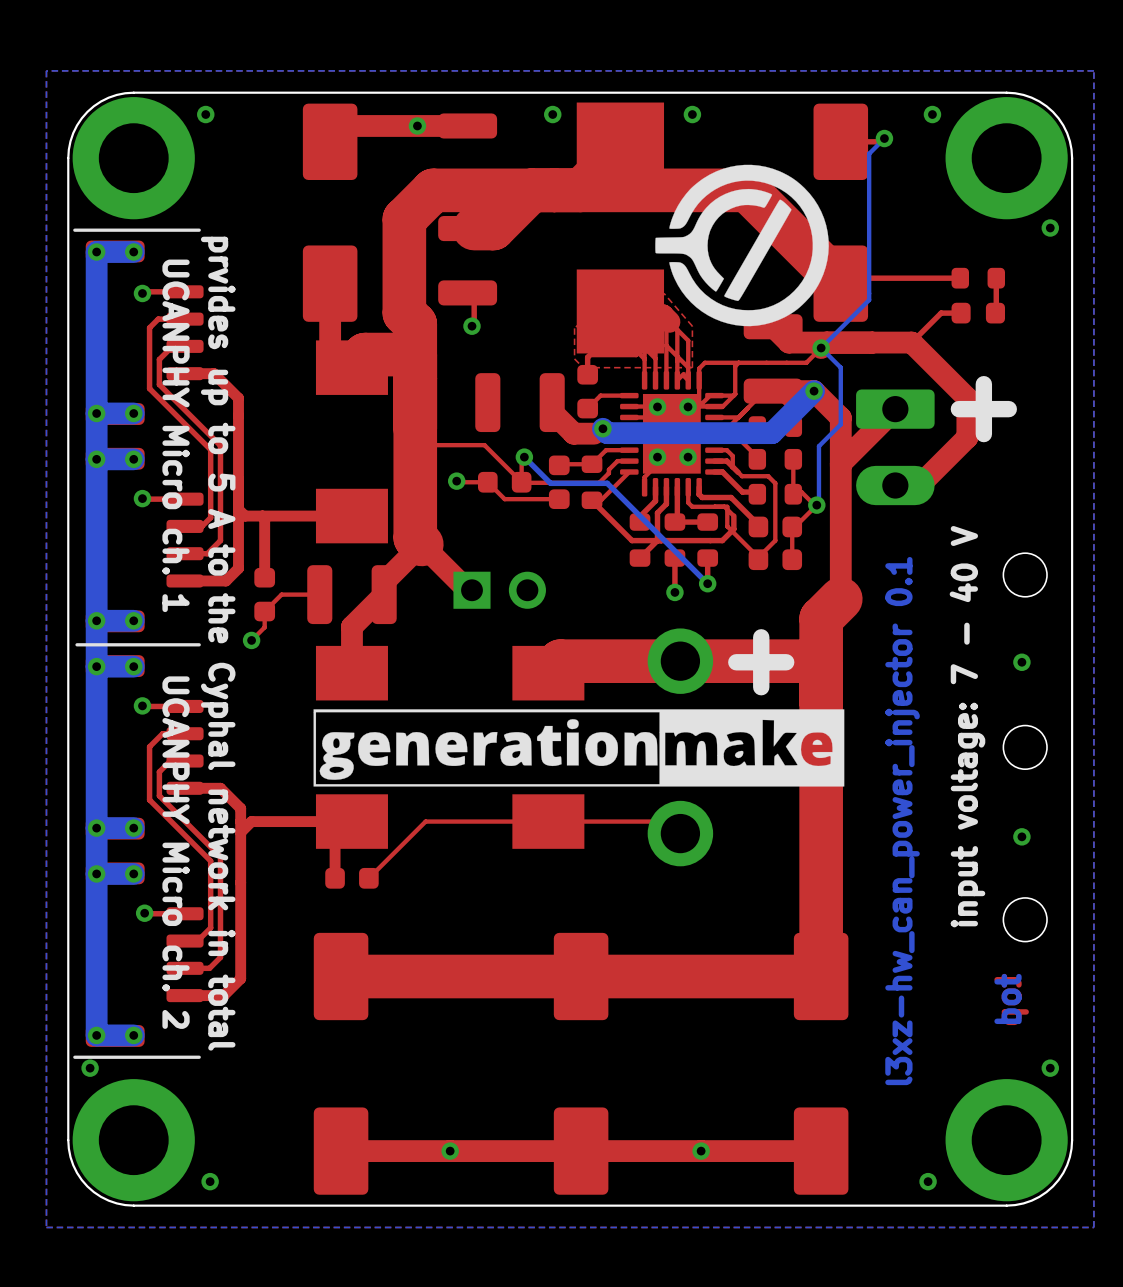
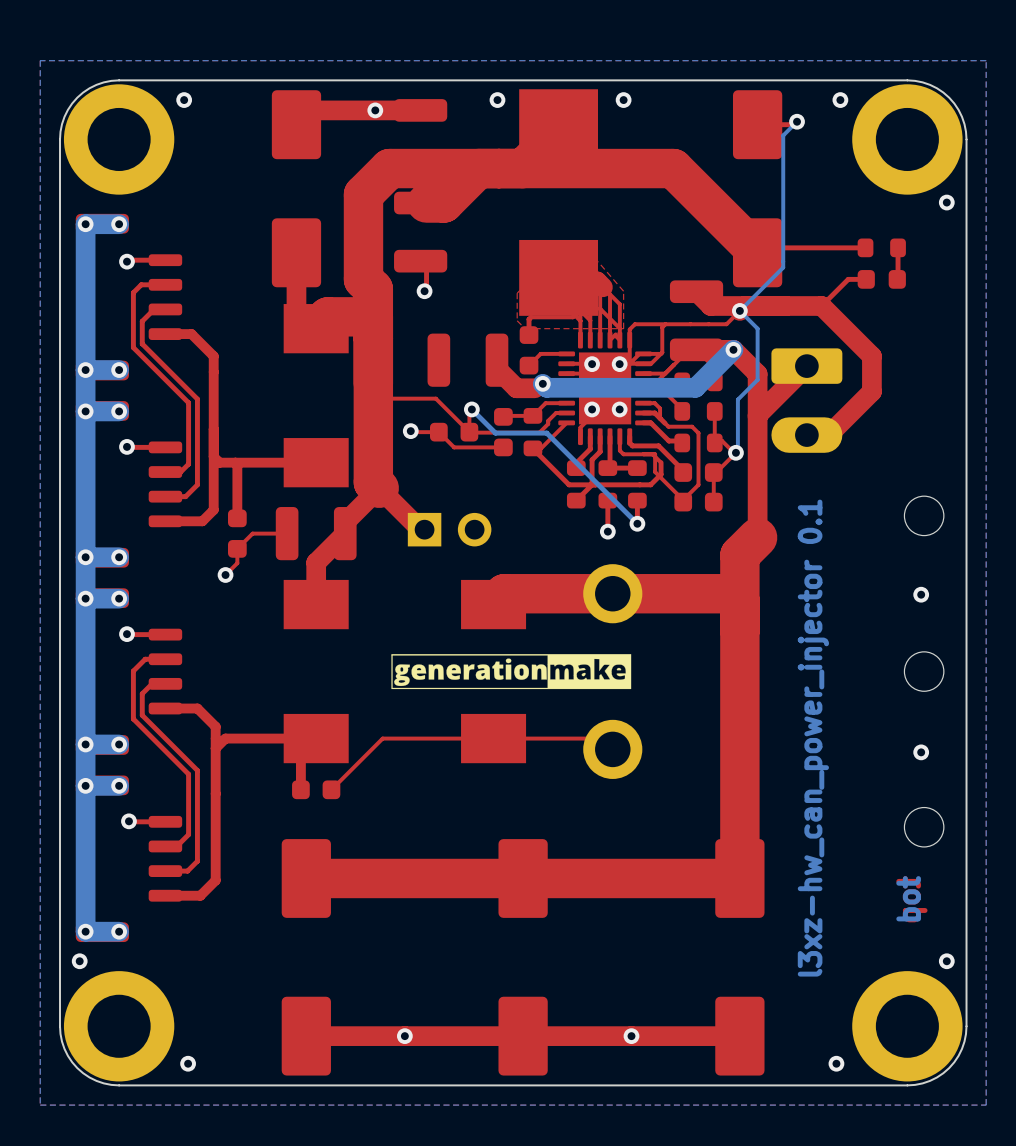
drawing: [655, 164, 829, 327] -> none
line: (199, 230) (74, 230) -> none
text: + (983, 409) -> none
text: UCANPHY Micro ch. 1 (176, 435) -> none
text: prvides up to 5 A to the Cyphal network in total (218, 643) -> none
line: (199, 644) (77, 644) -> none
text: + (761, 662) -> none
drawing shape: [313, 709, 845, 787] -> [391, 654, 632, 690]
text: input voltage: 7 - 40 V (967, 726) -> none
text: UCANPHY Micro ch. 2 (176, 852) -> none
line: (199, 1057) (74, 1057) -> none

